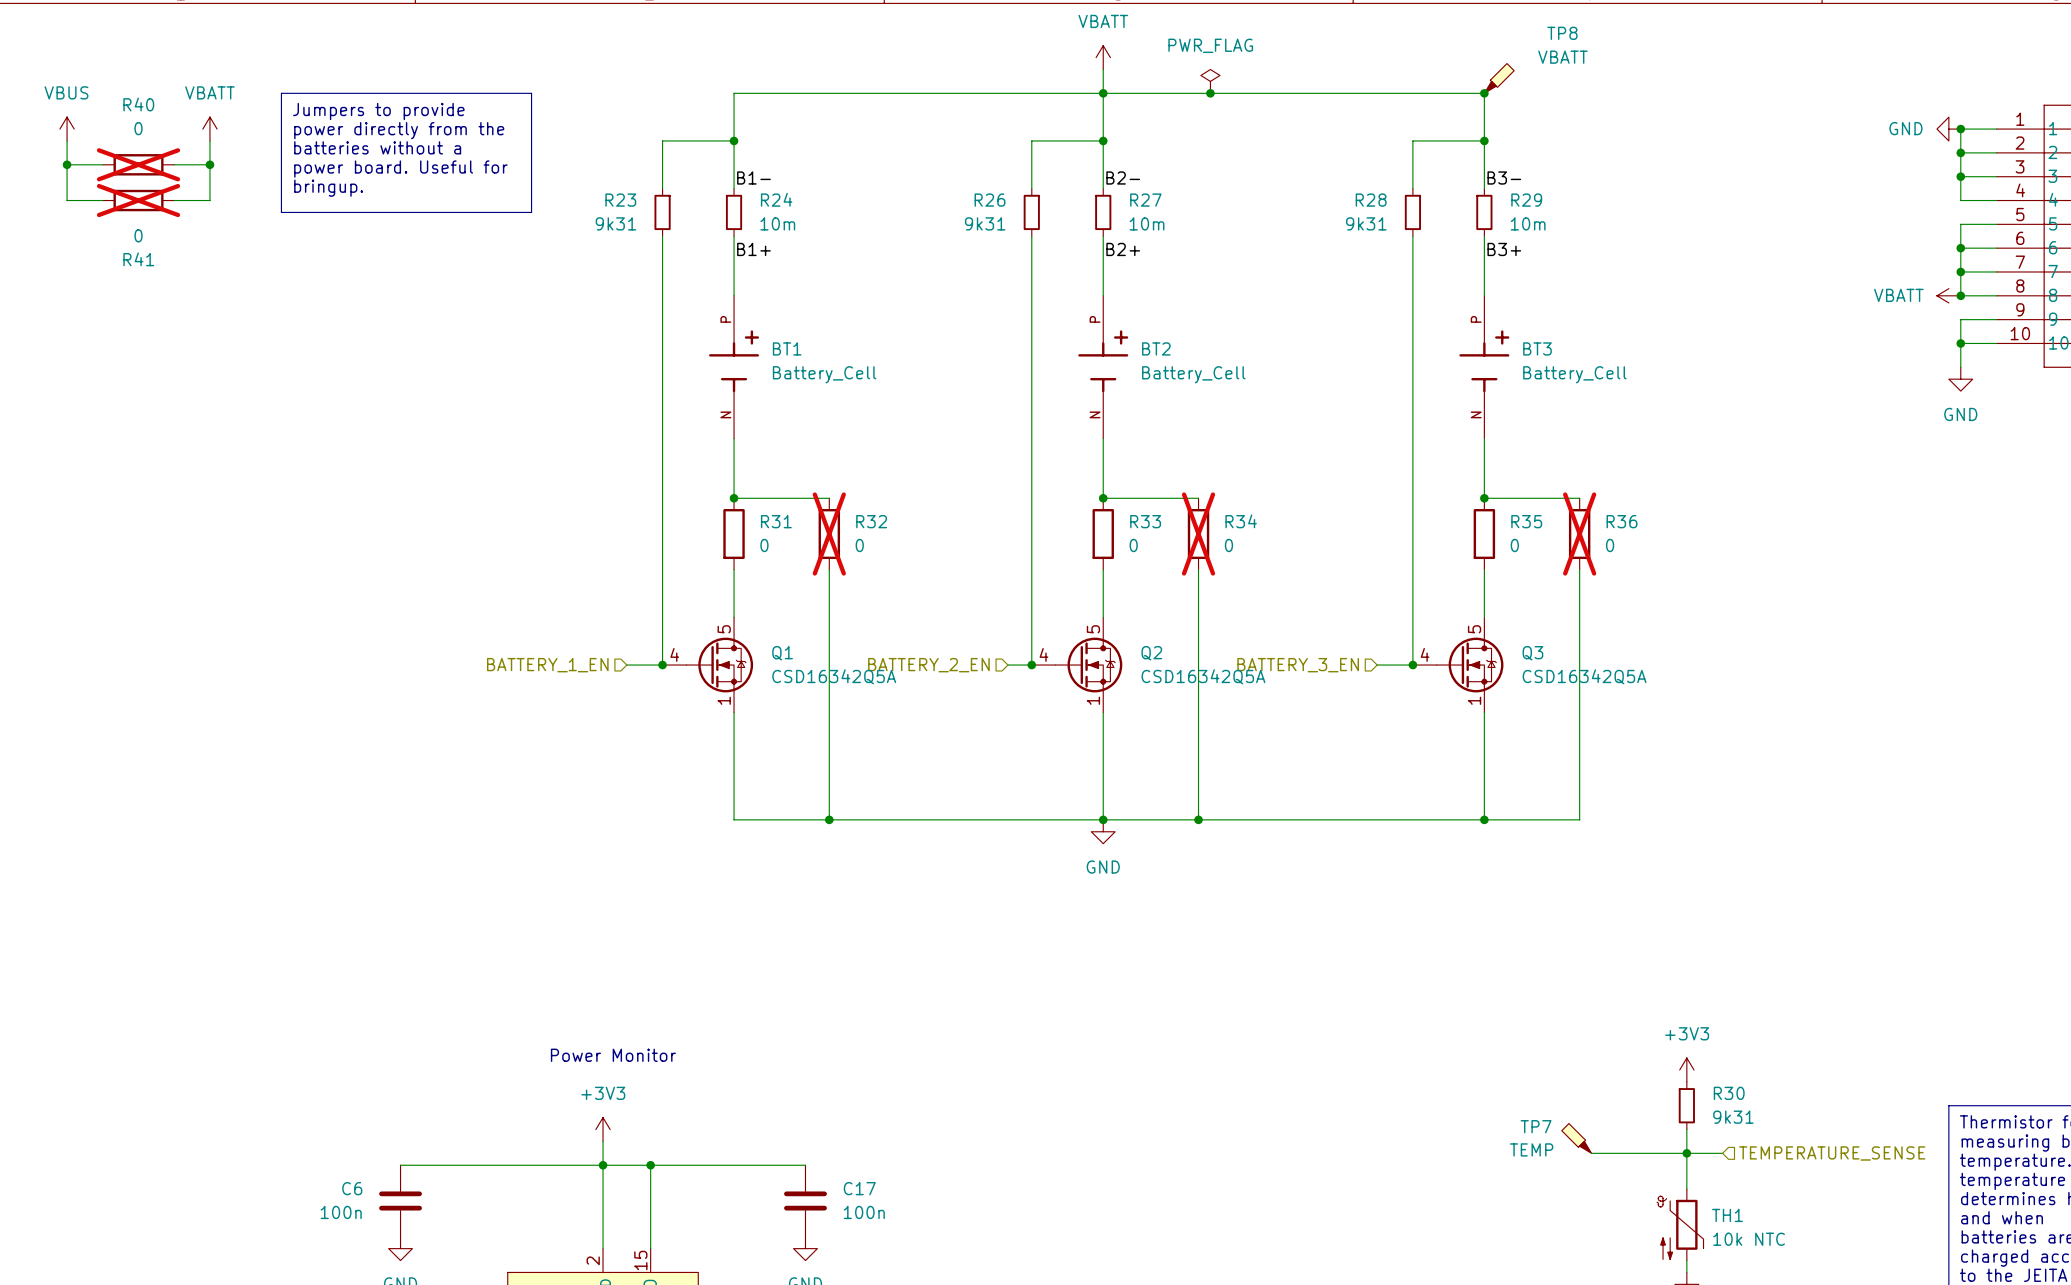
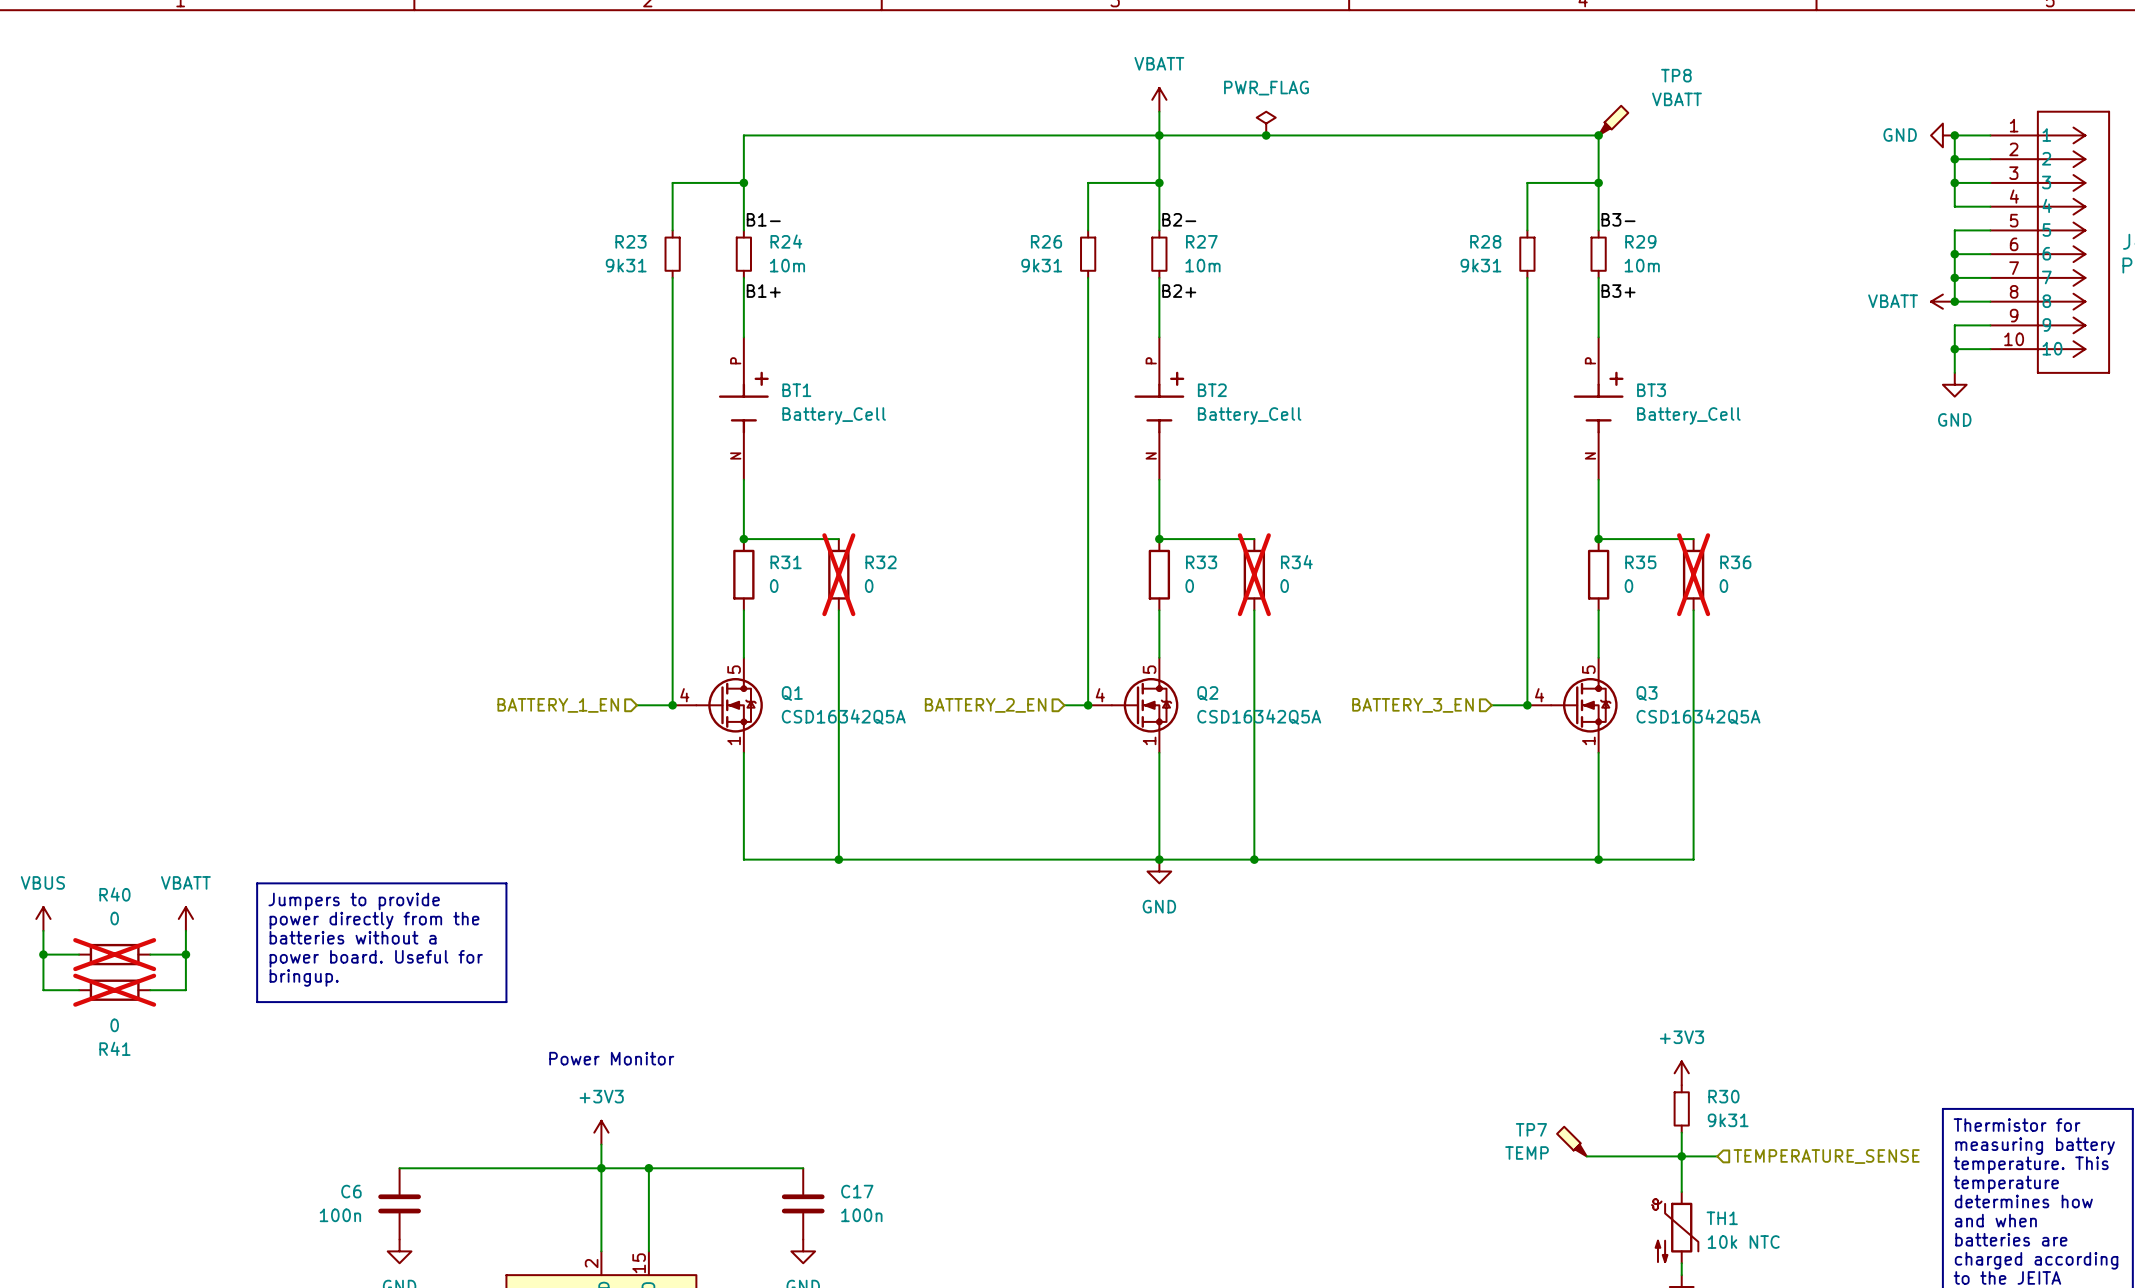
power symbol position: VBATT (1103, 57) -> VBATT (1159, 99)
wire: (1103, 69) (1103, 188) -> (1159, 111) (1159, 230)
TP8 position: (1499, 78) -> (1613, 120)
power symbol position: PWR_FLAG (1210, 81) -> PWR_FLAG (1266, 123)
line: (281, 93) (531, 93) (531, 212) (281, 212) (281, 93) -> none
junction: (1103, 93) -> none
junction: (1210, 93) -> none
junction: (1484, 93) -> none
text: Jumpers to provide (378, 111) -> none
power symbol: VBUS (67, 129) -> none
power symbol: VBATT (209, 129) -> none
junction: none -> (1159, 135)
junction: none -> (1266, 135)
junction: none -> (1598, 135)
text: power directly from the (399, 130) -> none
wire: (67, 140) (67, 200) (102, 200) -> none
wire: (209, 140) (209, 200) (174, 200) -> none
wire: (734, 140) (662, 140) (662, 188) -> (743, 182) (672, 182) (672, 230)
junction position: (734, 140) -> (743, 182)
wire: (1103, 140) (1031, 140) (1031, 188) -> (1159, 182) (1088, 182) (1088, 230)
junction: (1103, 140) -> none
wire: (1484, 140) (1412, 140) (1412, 188) -> (1598, 182) (1527, 182) (1527, 230)
junction: (1484, 140) -> none
text: batteries without a (377, 147) -> none
wire: (67, 164) (102, 164) -> none
junction: (67, 164) -> none
R40 position: (138, 164) -> (114, 954)
wire: (174, 164) (209, 164) -> none
junction: (209, 164) -> none
text: power board. Useful for (400, 169) -> none
junction: none -> (1159, 182)
junction: none -> (1598, 182)
label position: B1- (753, 177) -> B1- (763, 219)
label position: B2- (1123, 177) -> B2- (1179, 219)
label position: B3- (1504, 177) -> B3- (1618, 219)
text: bringup. (328, 188) -> none
wire: (734, 188) (734, 93) (1484, 93) (1484, 188) -> none
R41 position: (138, 200) -> (114, 990)
R23 position: (662, 212) -> (672, 254)
R24 position: (734, 212) -> (743, 254)
R26 position: (1031, 212) -> (1088, 254)
R27 position: (1103, 212) -> (1159, 254)
R28 position: (1412, 212) -> (1527, 254)
R29 position: (1484, 212) -> (1598, 254)
wire: none -> (743, 230) (743, 135) (1598, 135) (1598, 230)
wire: (662, 236) (662, 665) (626, 665) -> (672, 277) (672, 705) (637, 705)
wire: (734, 236) (734, 295) -> (743, 277) (743, 337)
wire: (1031, 236) (1031, 665) (1007, 665) -> (1088, 277) (1088, 705) (1064, 705)
wire: (1103, 236) (1103, 295) -> (1159, 277) (1159, 337)
wire: (1412, 236) (1412, 665) (1377, 665) -> (1527, 277) (1527, 705) (1491, 705)
wire: (1484, 236) (1484, 295) -> (1598, 277) (1598, 337)
label position: B1+ (753, 249) -> B1+ (763, 291)
label position: B2+ (1123, 249) -> B2+ (1179, 291)
label position: B3+ (1504, 249) -> B3+ (1618, 291)
BT1 position: (734, 367) -> (743, 408)
BT2 position: (1103, 367) -> (1159, 408)
BT3 position: (1484, 367) -> (1598, 408)
wire: (734, 438) (734, 498) (829, 498) -> (743, 479) (743, 539) (838, 539)
wire: (1103, 438) (1103, 498) (1198, 498) -> (1159, 479) (1159, 539) (1254, 539)
wire: (1484, 438) (1484, 498) (1579, 498) -> (1598, 479) (1598, 539) (1693, 539)
junction position: (734, 498) -> (743, 539)
junction: (1103, 498) -> none
junction: (1484, 498) -> none
R31 position: (734, 534) -> (743, 574)
R32 position: (829, 534) -> (838, 574)
R33 position: (1103, 534) -> (1159, 574)
junction: none -> (1159, 539)
R34 position: (1198, 534) -> (1254, 574)
R35 position: (1484, 534) -> (1598, 574)
R36 position: (1579, 534) -> (1693, 574)
junction: none -> (1598, 539)
wire: (734, 569) (734, 617) -> (743, 610) (743, 657)
wire: (829, 569) (829, 819) -> (838, 610) (838, 859)
wire: (1103, 569) (1103, 617) -> (1159, 610) (1159, 657)
wire: (1198, 569) (1198, 819) -> (1254, 610) (1254, 859)
wire: (1484, 569) (1484, 617) -> (1598, 610) (1598, 657)
wire: (1579, 569) (1579, 819) (734, 819) (734, 712) -> none
wire: none -> (1693, 610) (1693, 859) (743, 859) (743, 752)
hierarchical label position: BATTERY_1_EN (547, 665) -> BATTERY_1_EN (558, 705)
junction position: (662, 665) -> (672, 705)
Q1 position: (707, 665) -> (717, 705)
hierarchical label position: BATTERY_2_EN (928, 665) -> BATTERY_2_EN (985, 705)
junction: (1031, 665) -> none
Q2 position: (1077, 665) -> (1133, 705)
hierarchical label position: BATTERY_3_EN (1298, 665) -> BATTERY_3_EN (1413, 705)
junction: (1412, 665) -> none
Q3 position: (1458, 665) -> (1572, 705)
junction: none -> (1088, 705)
junction: none -> (1527, 705)
wire: (1103, 712) (1103, 819) -> (1159, 752) (1159, 859)
wire: (1484, 712) (1484, 819) -> (1598, 752) (1598, 859)
junction position: (829, 819) -> (838, 859)
junction: (1103, 819) -> none
junction: (1198, 819) -> none
junction: (1484, 819) -> none
power symbol position: GND (1103, 831) -> GND (1159, 871)
junction: none -> (1159, 859)
junction: none -> (1254, 859)
junction: none -> (1598, 859)
line: none -> (257, 883) (506, 883) (506, 1002) (257, 1002) (257, 883)
text: none -> Jumpers to provide (354, 901)
power symbol: none -> VBUS (43, 918)
power symbol: none -> VBATT (185, 918)
text: none -> power directly from the (374, 920)
wire: none -> (43, 930) (43, 990) (79, 990)
wire: none -> (185, 930) (185, 990) (150, 990)
text: none -> batteries without a (353, 937)
wire: none -> (43, 954) (79, 954)
junction: none -> (43, 954)
wire: none -> (150, 954) (185, 954)
junction: none -> (185, 954)
text: none -> power board. Useful for (376, 958)
text: none -> bringup. (304, 977)

